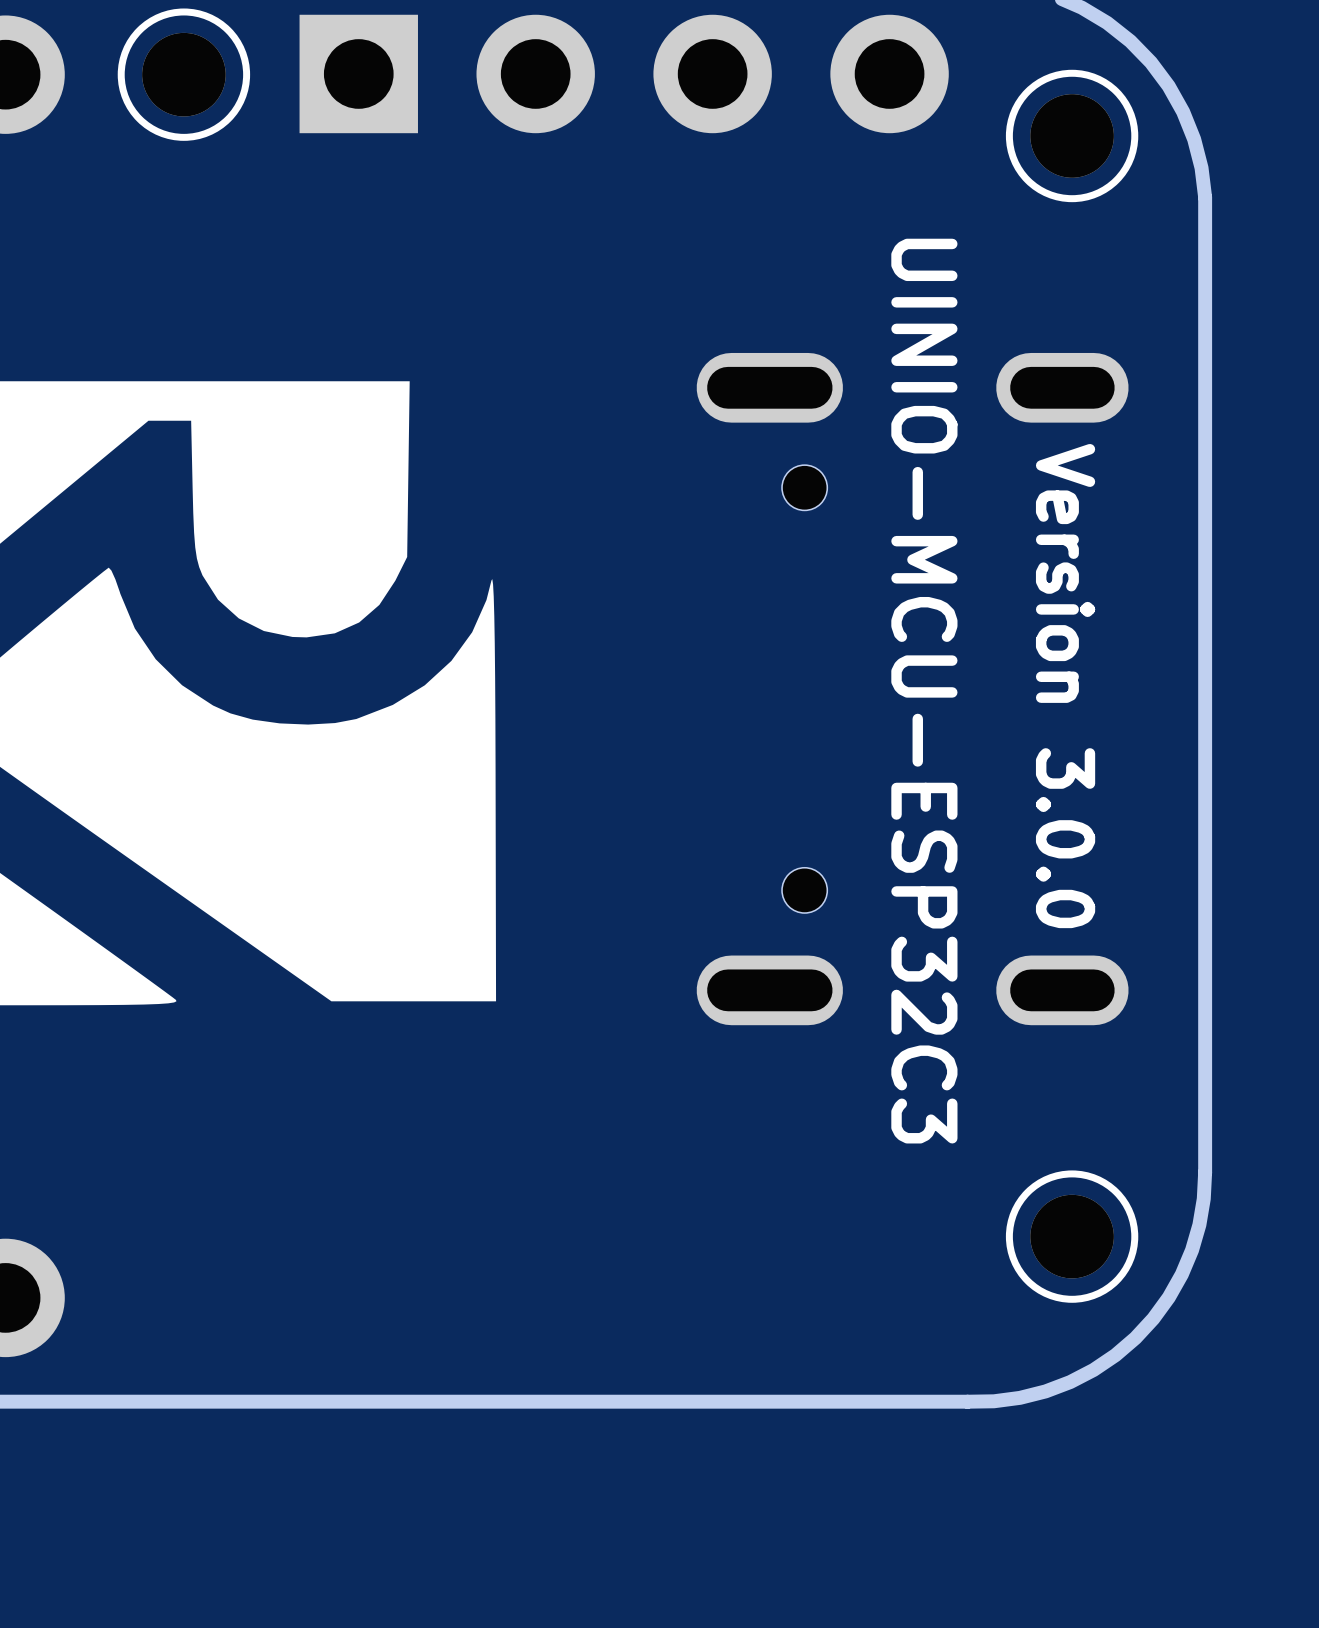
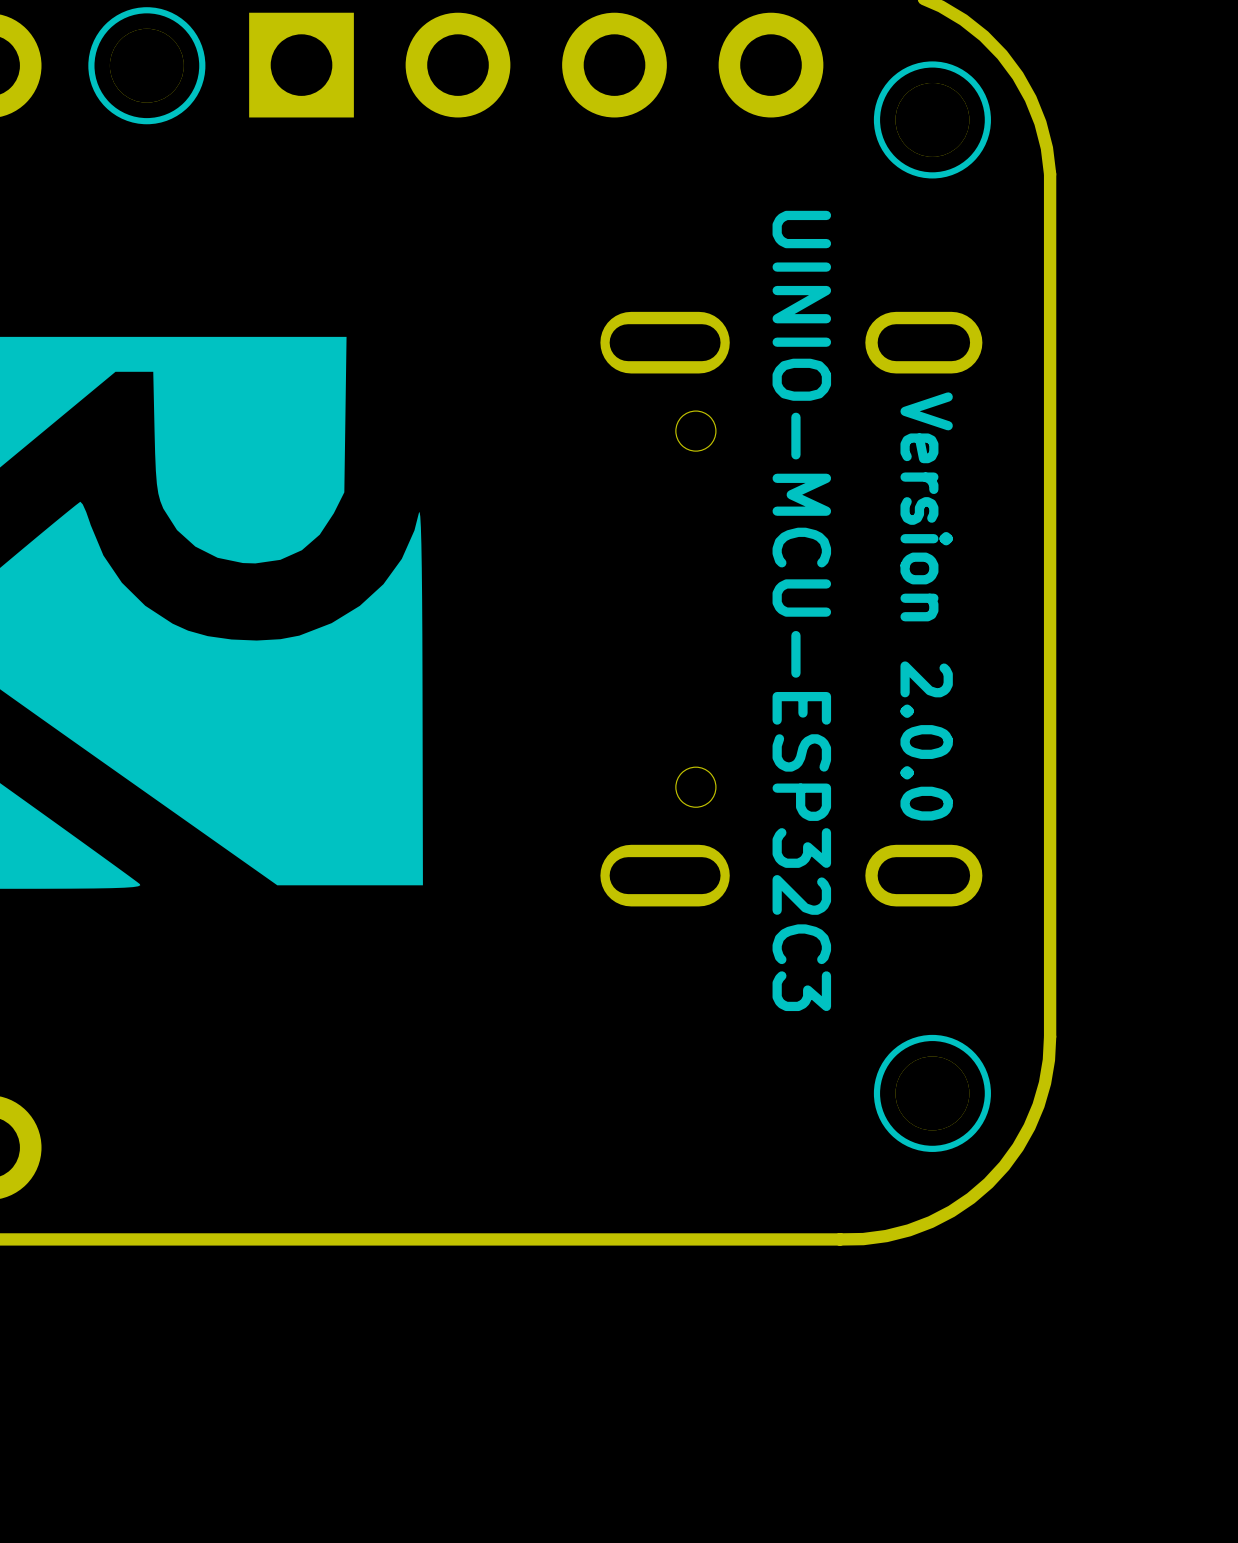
text: Version 3.0.0 (1065, 686) -> Version 2.0.0 (926, 606)

